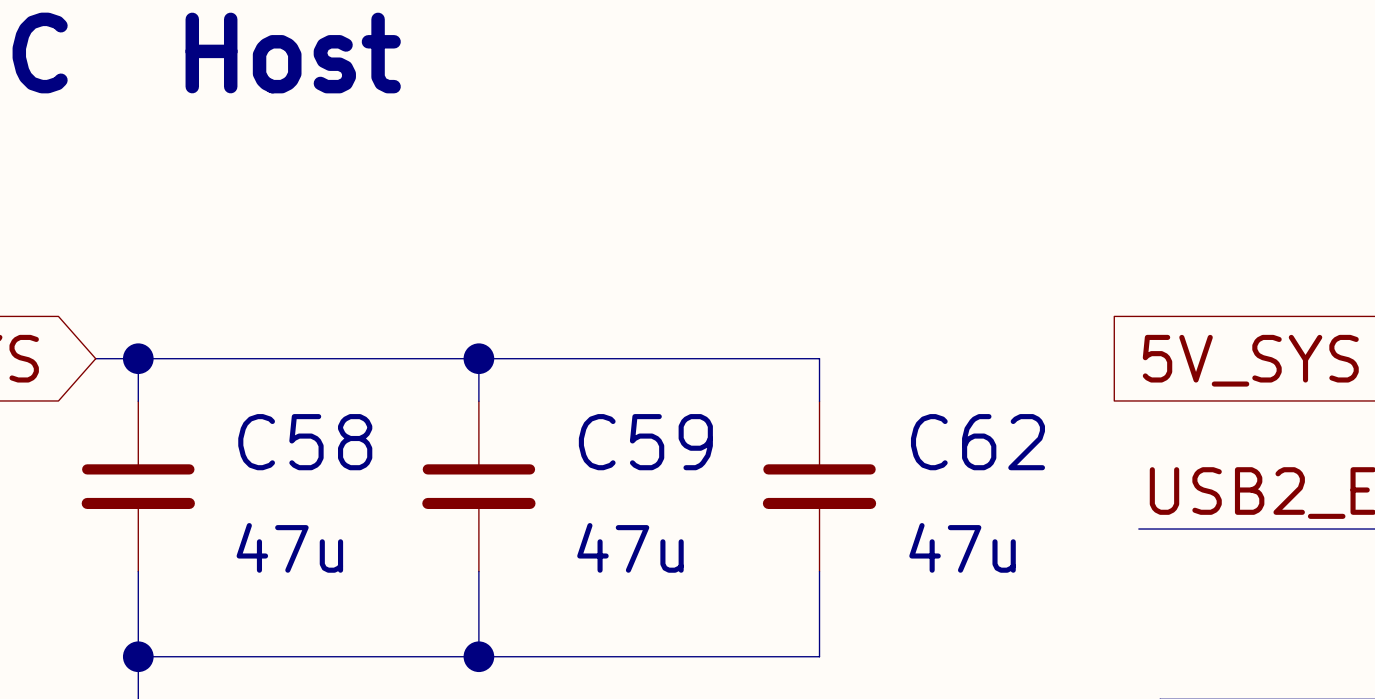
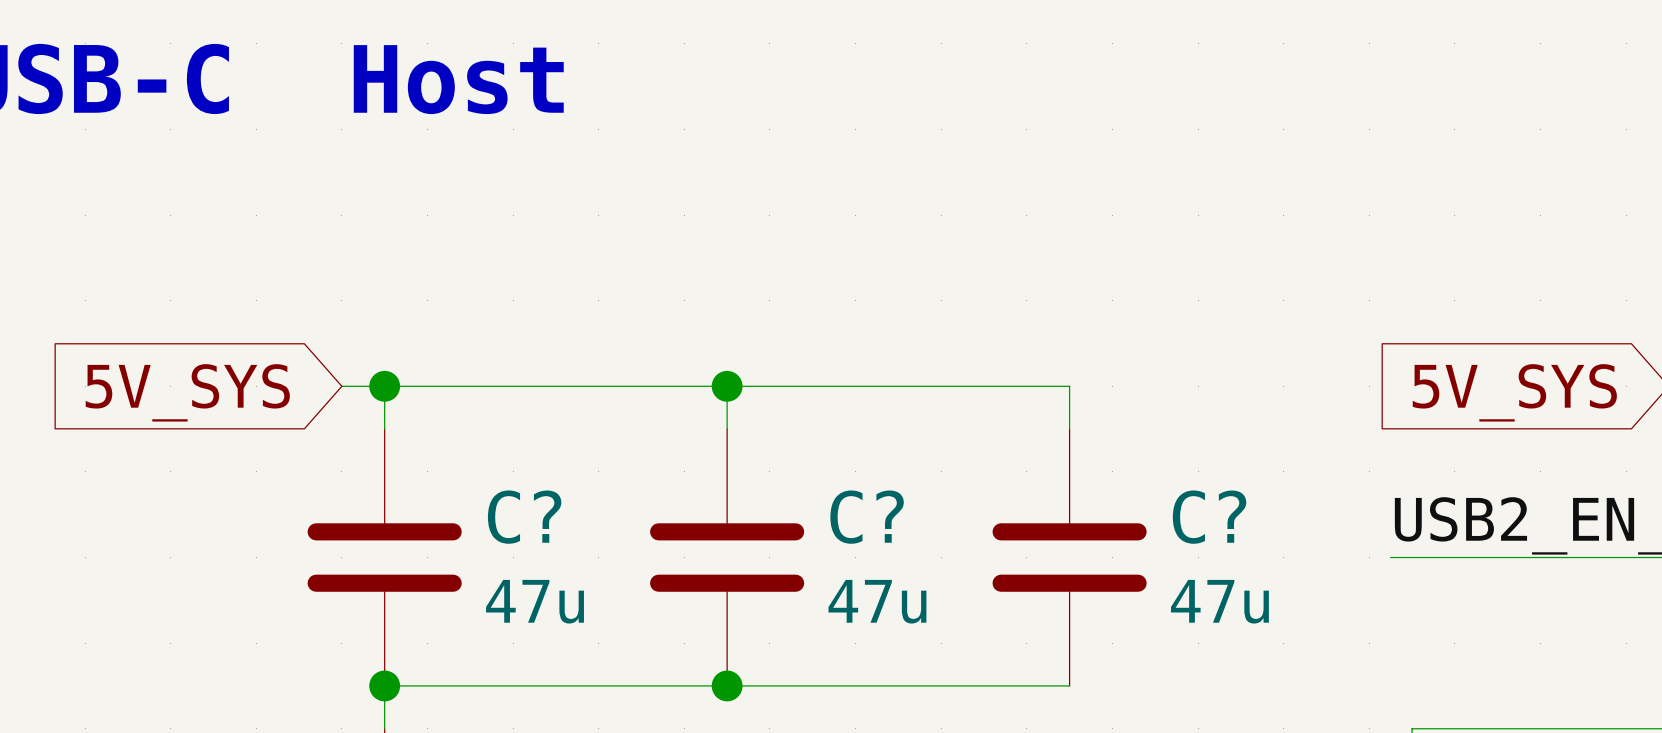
C58: (138, 486) -> none
C59: (478, 486) -> none
C62: (819, 486) -> none
C?: none -> (384, 557)
C?: none -> (727, 557)
C?: none -> (1069, 557)

